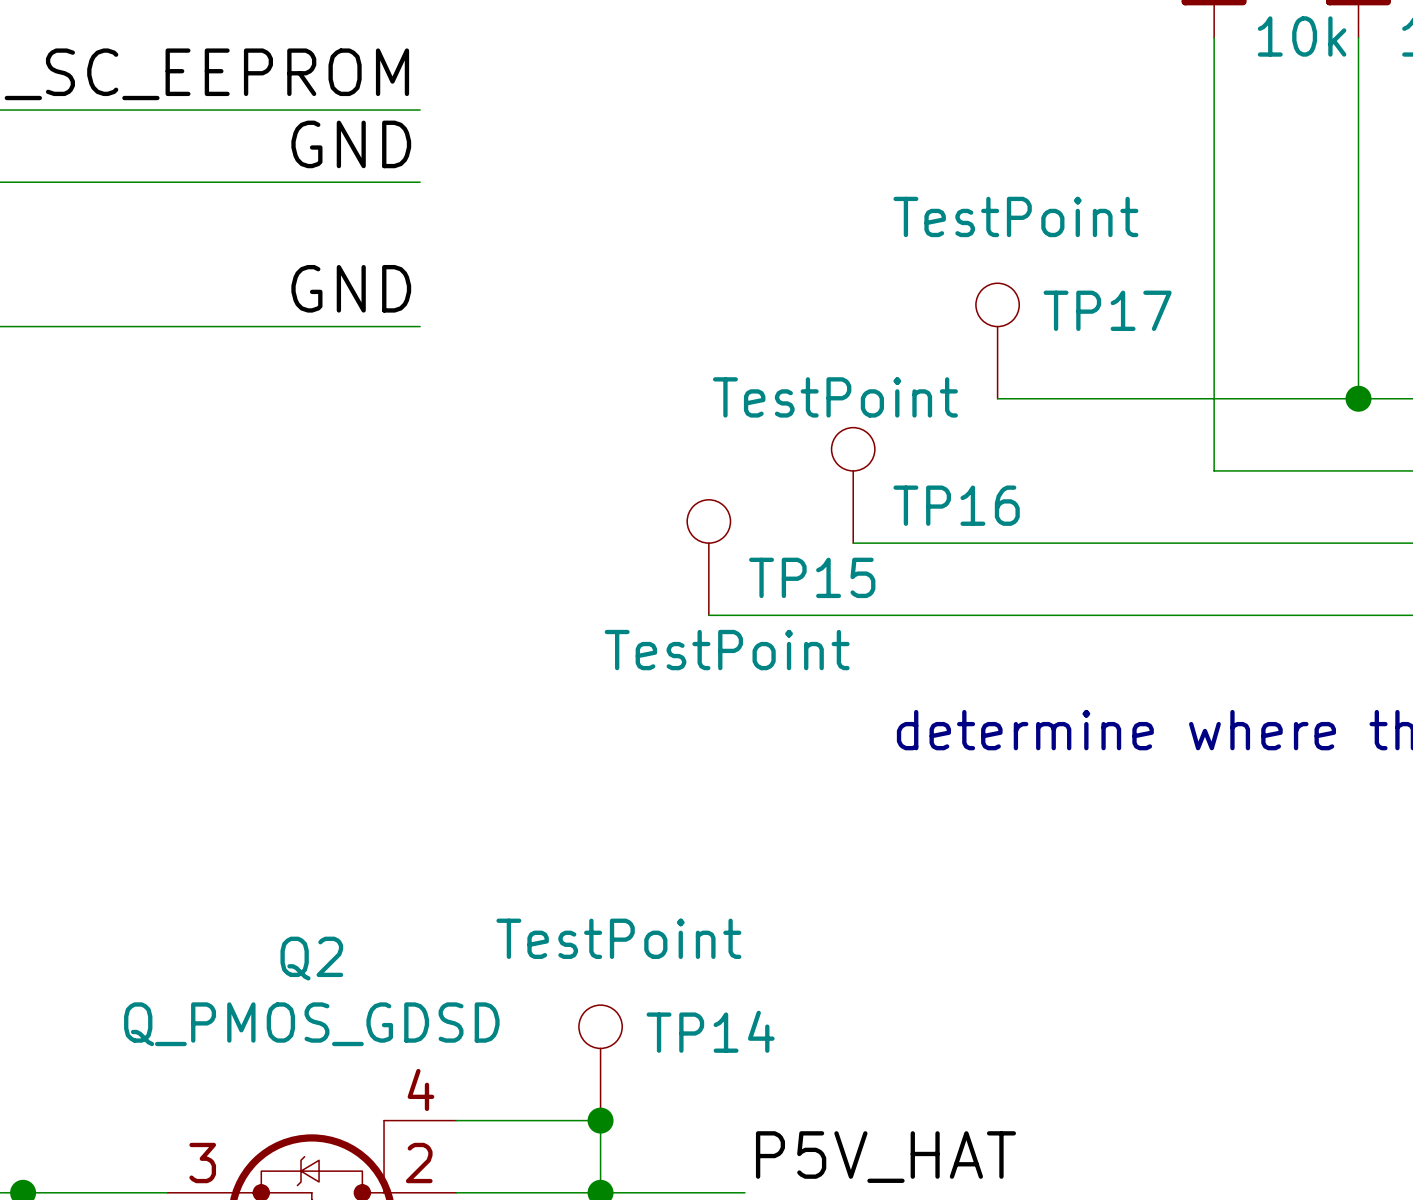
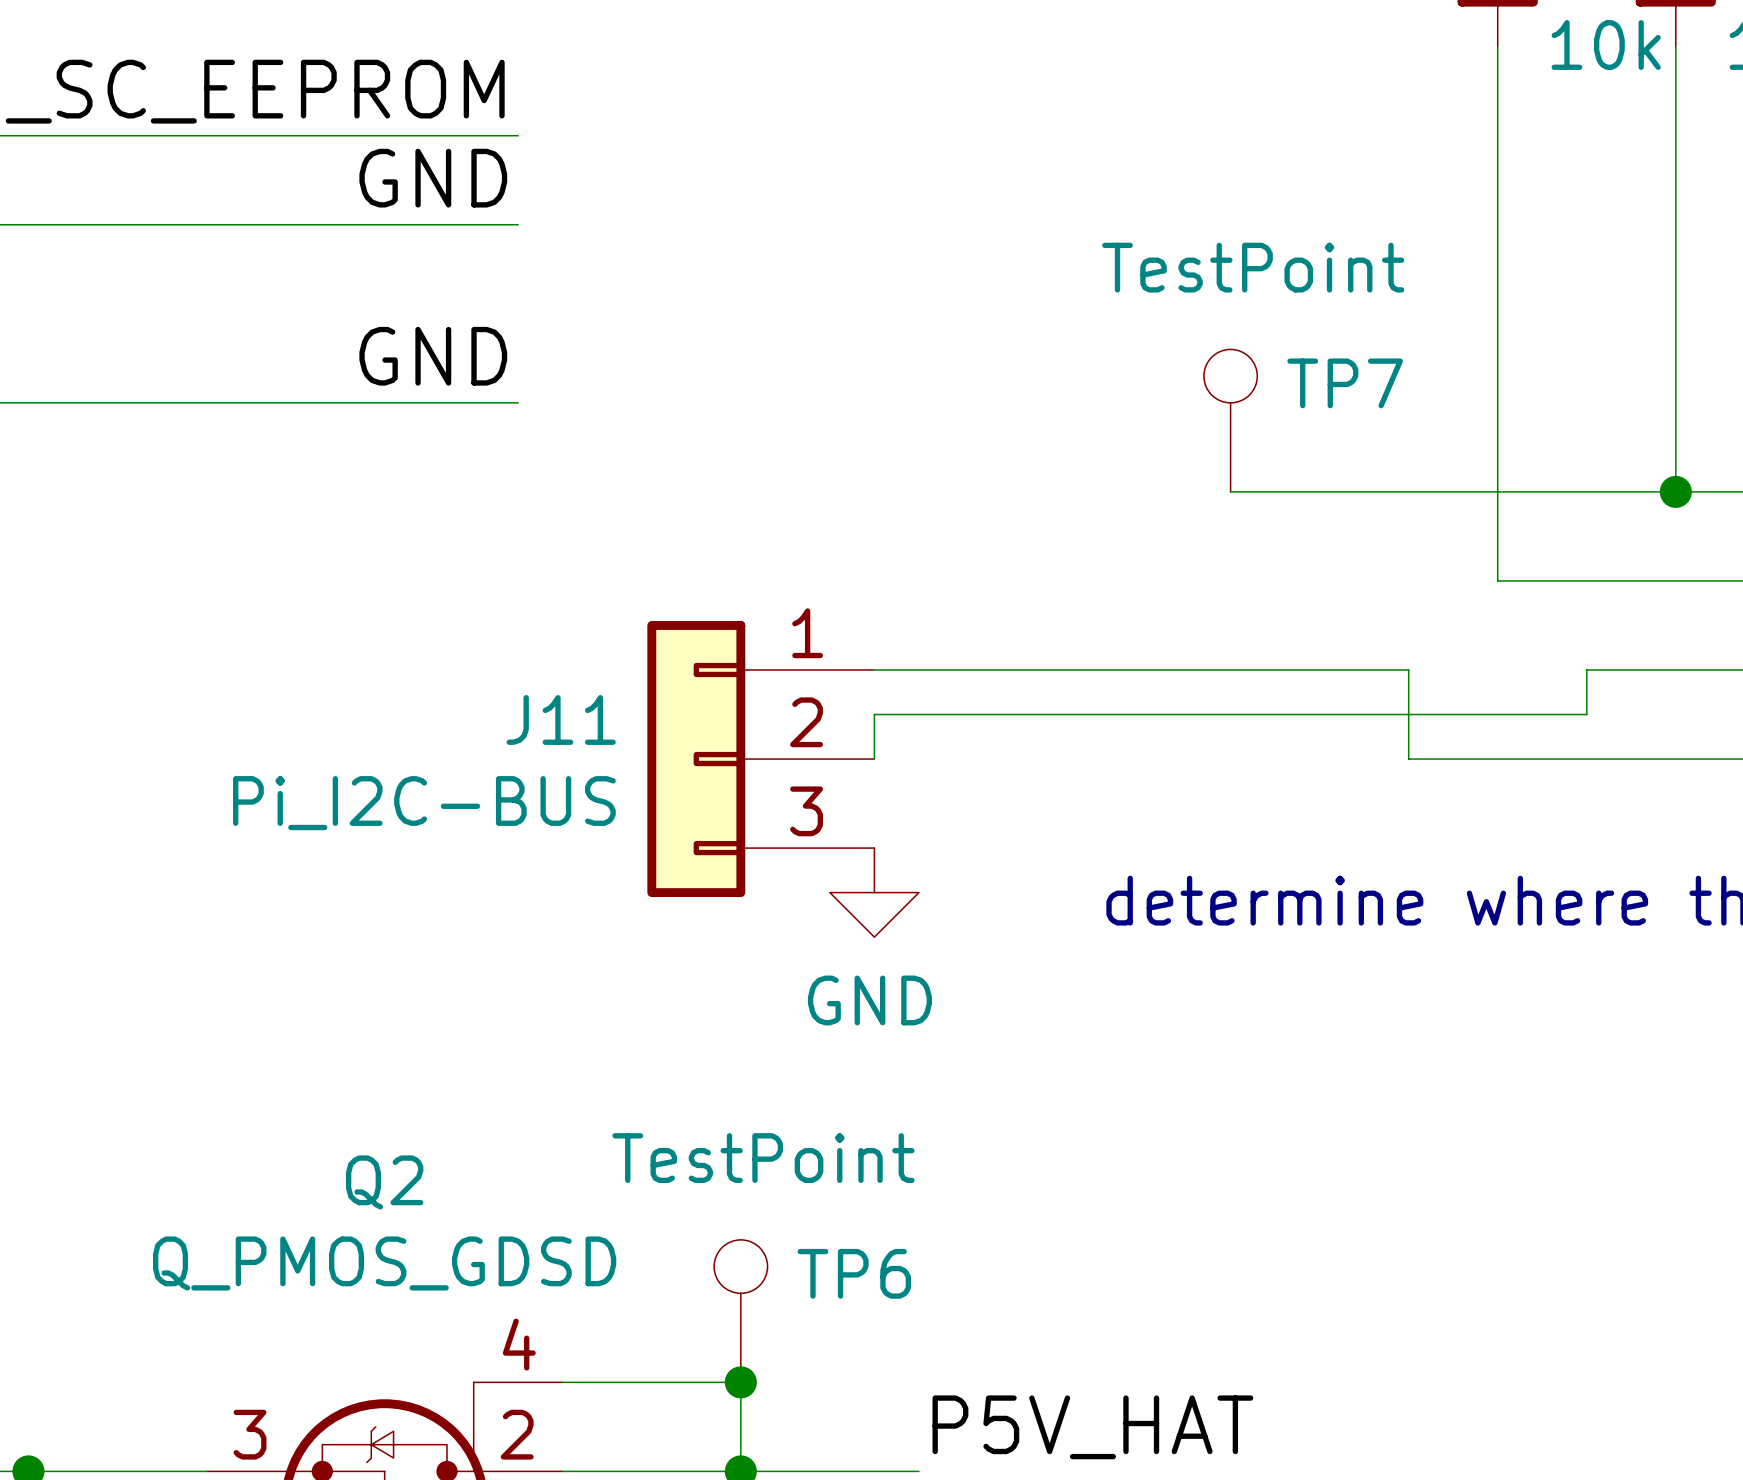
TP17 name: TP17 (1107, 310) -> TP7 (1345, 383)
TP16: TestPoint (853, 485) -> none
wire: none -> (874, 669) (1052, 669)
wire: (1141, 543) (1286, 543) -> (1408, 669) (1408, 759)
TP15: TestPoint (708, 557) -> none
J11: none -> Pi_I2C-BUS (760, 759)
wire: (708, 615) (1141, 615) -> (874, 759) (874, 714) (1586, 714) (1586, 669)
power symbol: none -> GND (874, 892)
TP14 name: TP14 (710, 1031) -> TP6 (854, 1273)

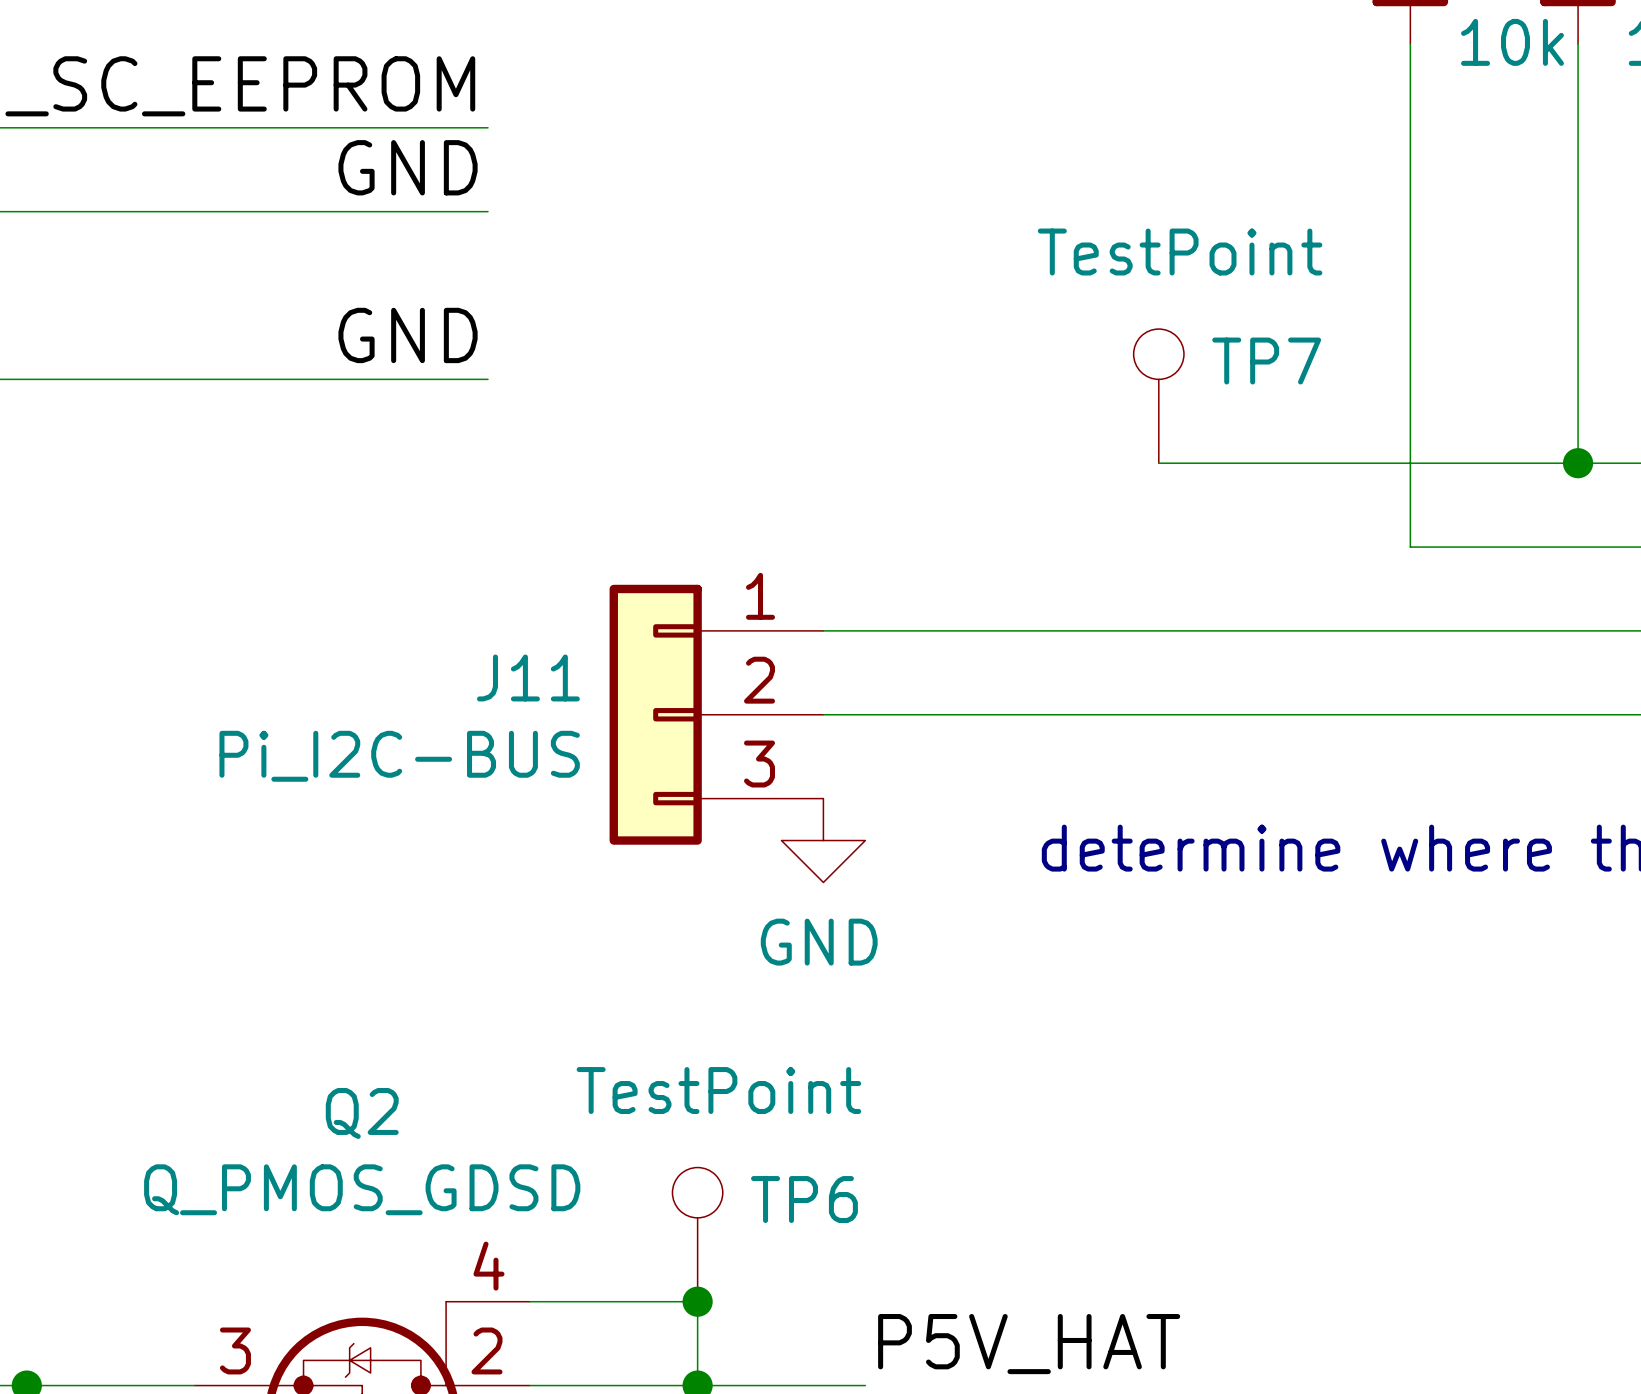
wire: (1408, 669) (1408, 759) -> (1326, 630) (1494, 630)
wire: (1586, 669) (1586, 714) (874, 714) (874, 759) -> (1326, 714) (823, 714)

